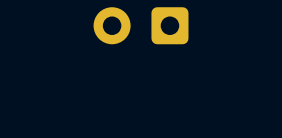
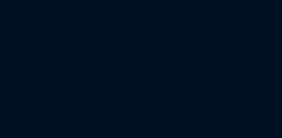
part: (141, 25) -> none

